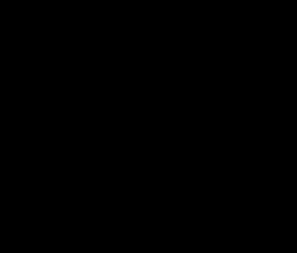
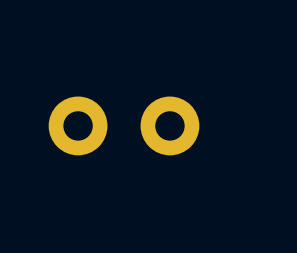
part: none -> (124, 125)

